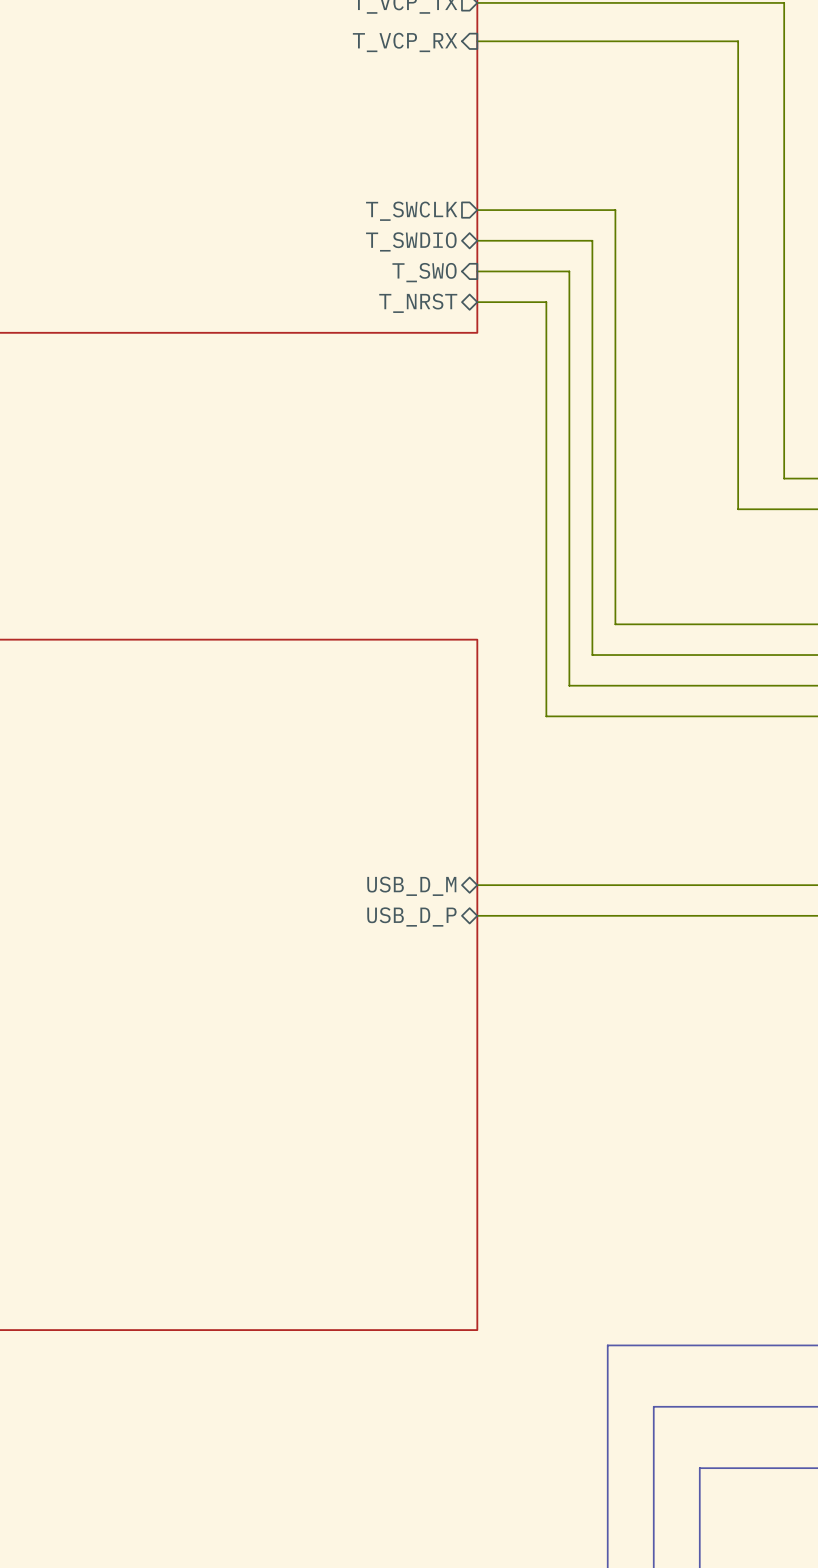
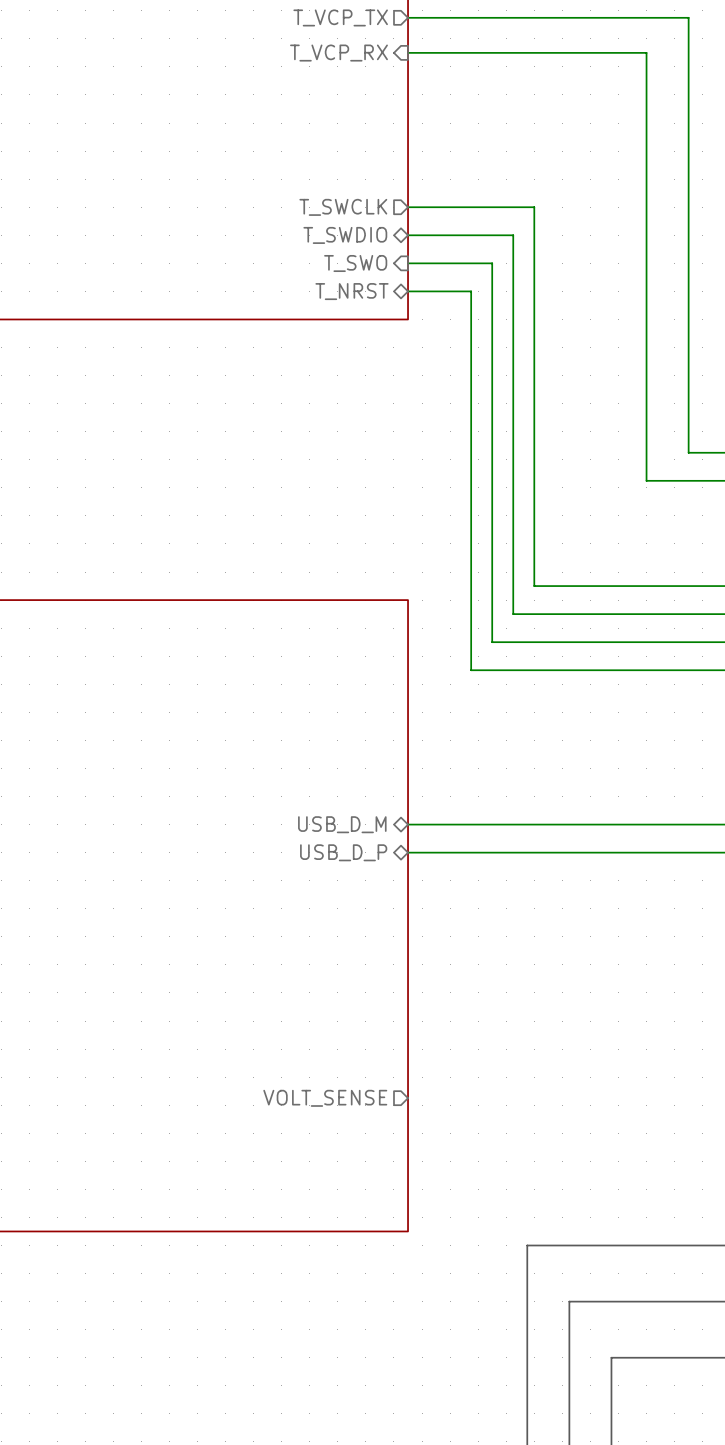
sheet pin: none -> VOLT_SENSE (325, 1098)

